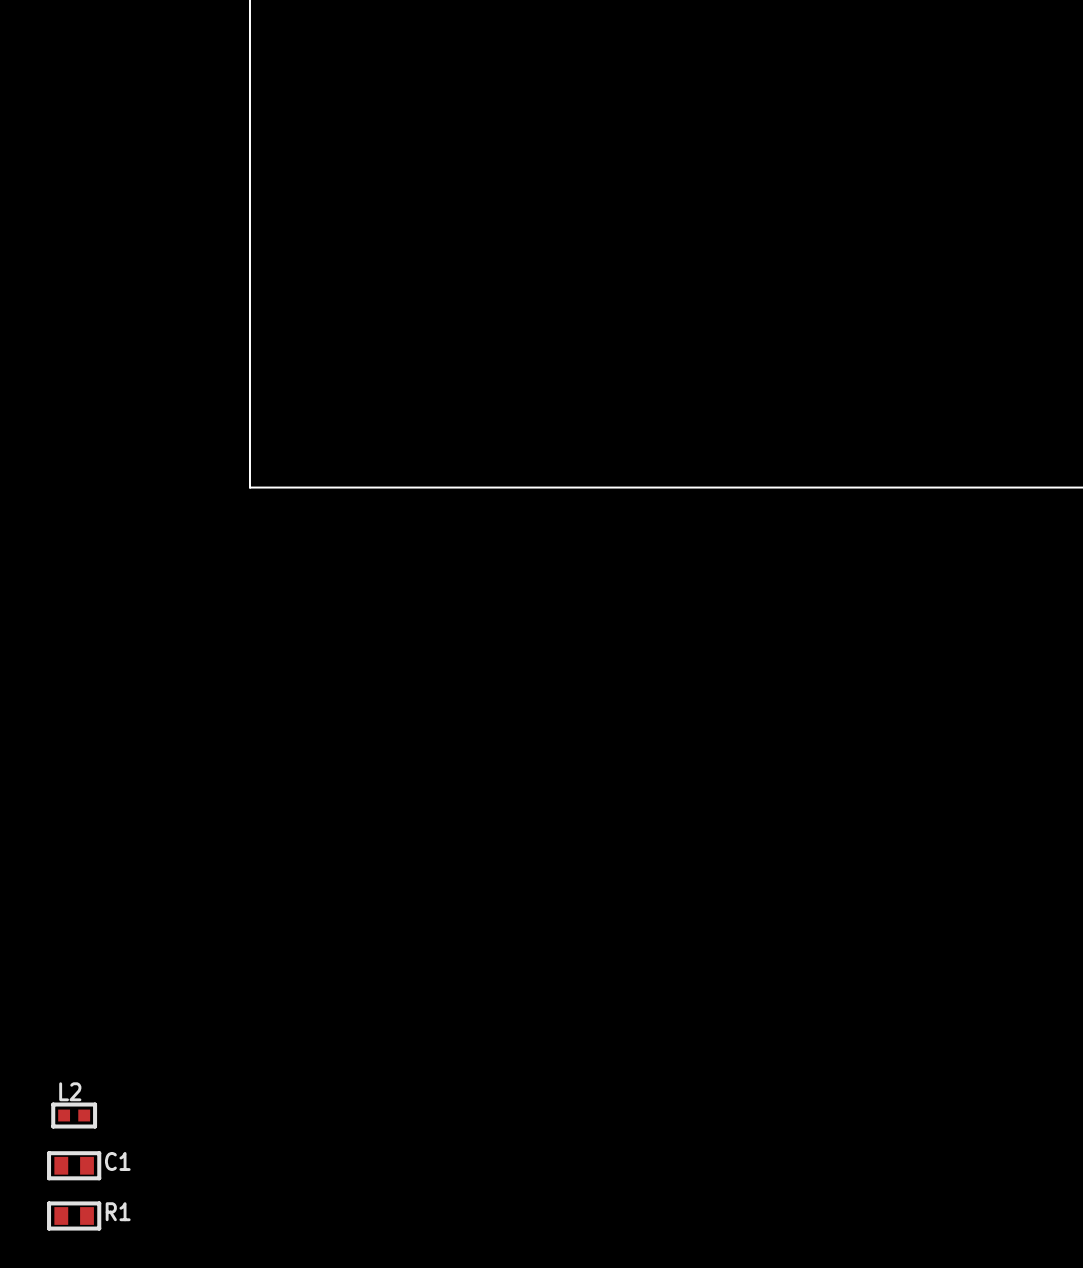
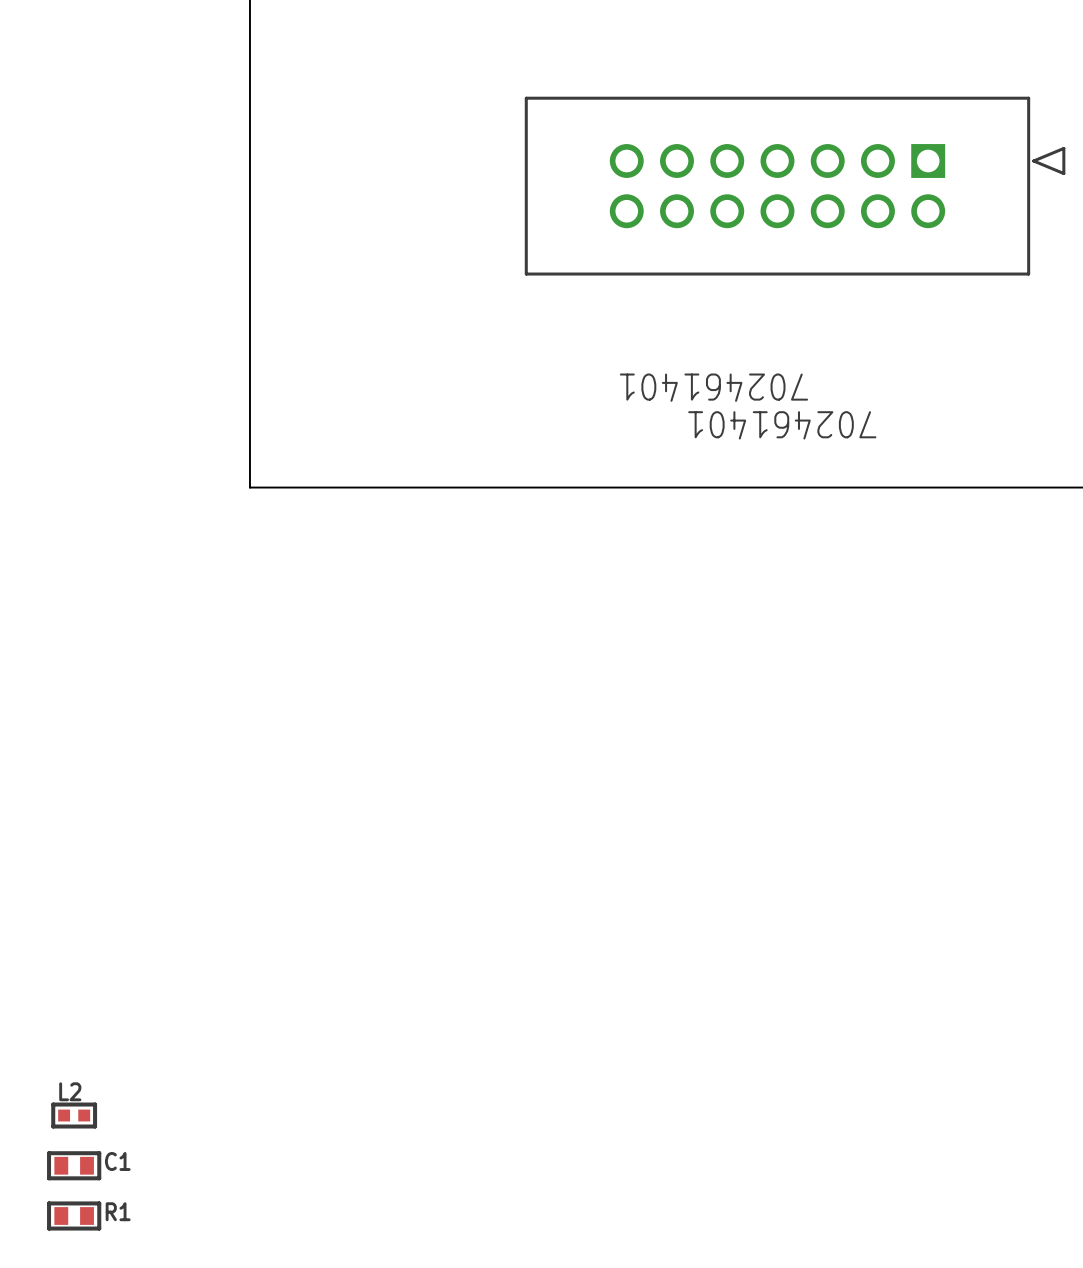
part: none -> 702461401 (795, 186)

